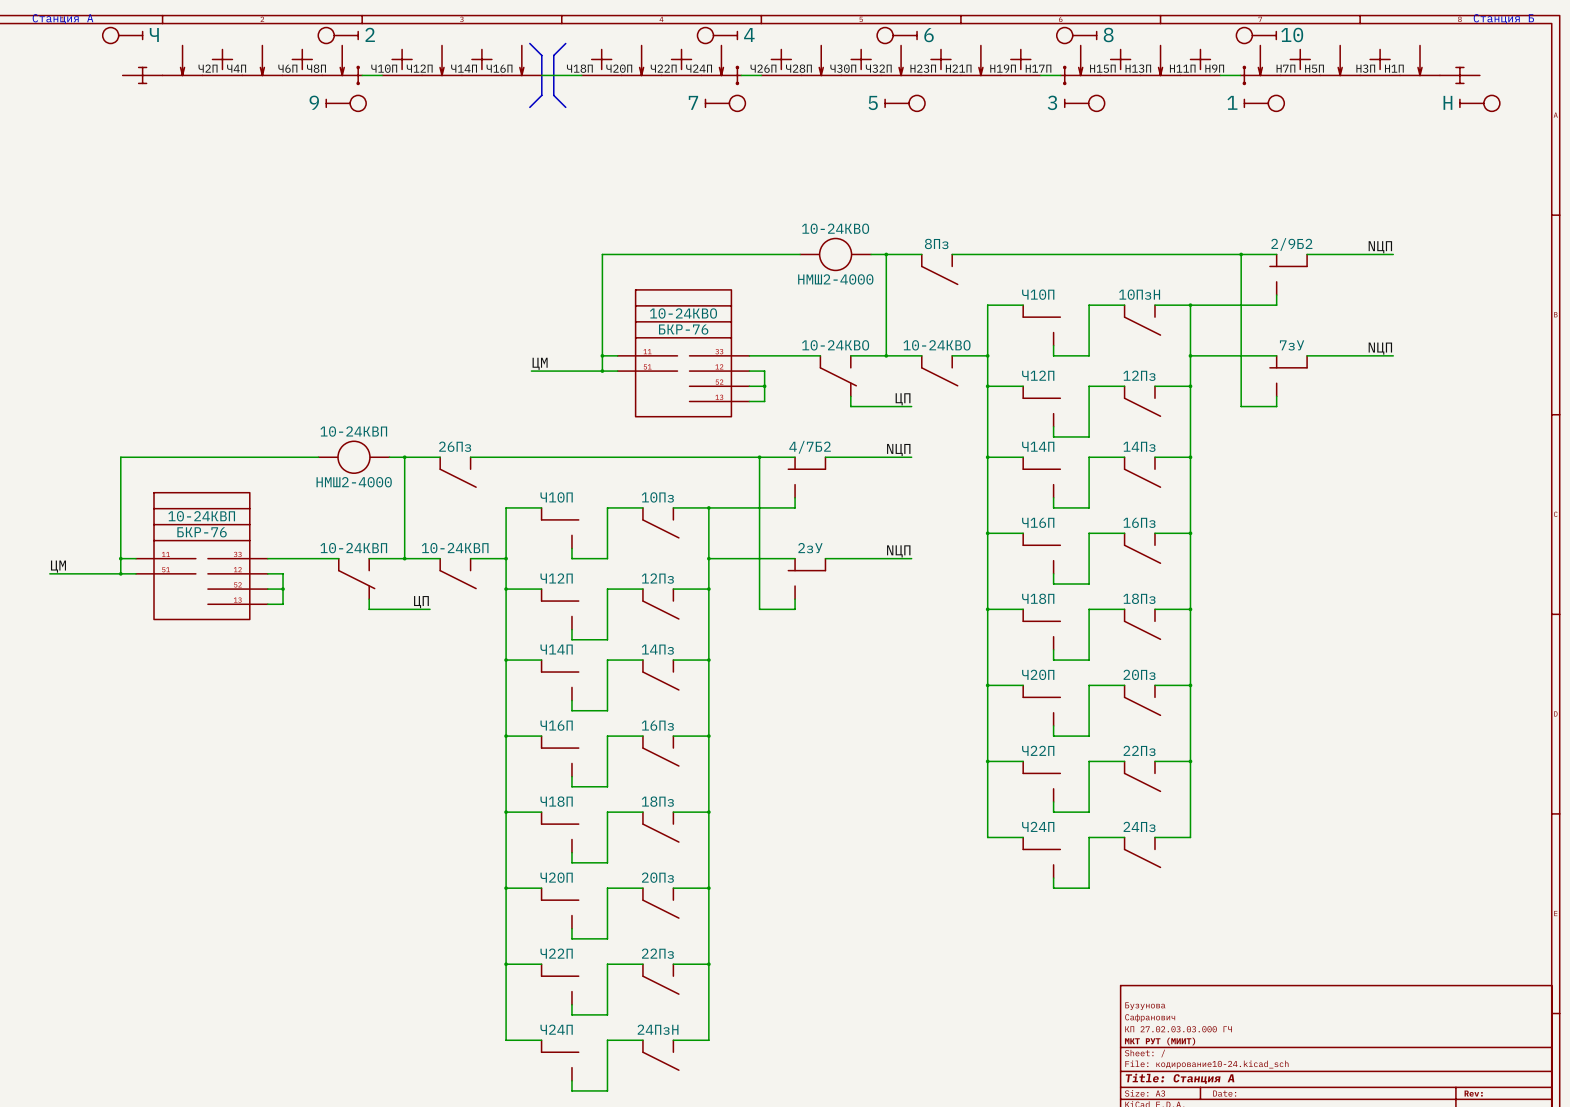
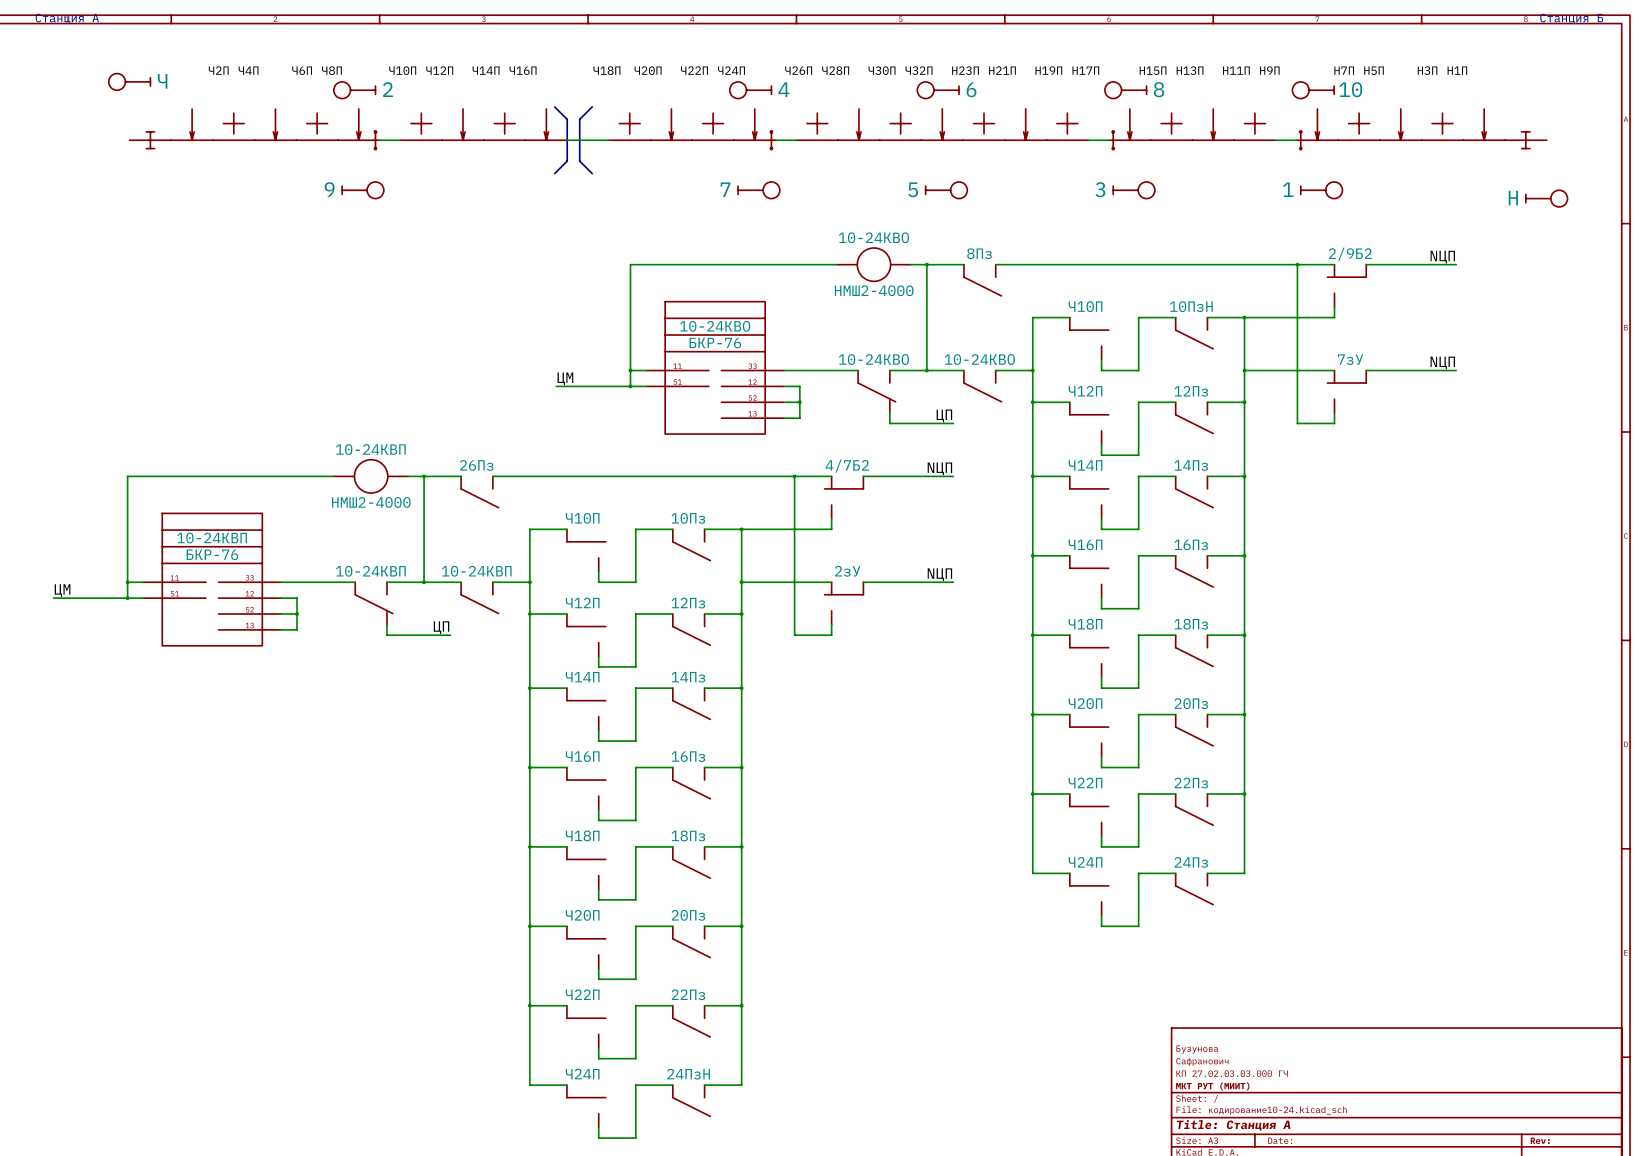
part position: (122, 35) -> (129, 81)
part position: (338, 35) -> (354, 90)
part position: (717, 35) -> (750, 90)
part position: (897, 35) -> (938, 90)
part position: (1076, 35) -> (1125, 90)
part position: (1256, 35) -> (1313, 90)
line: (529, 43) (541, 55) (541, 95) (529, 107) -> (554, 106) (567, 119) (567, 161) (554, 173)
line: (565, 43) (553, 55) (553, 95) (565, 107) -> (592, 106) (579, 119) (579, 161) (592, 173)
part: (182, 60) -> none
part: (262, 60) -> none
part: (342, 60) -> none
part: (442, 60) -> none
part: (521, 60) -> none
part: (641, 60) -> none
part: (721, 60) -> none
part: (821, 60) -> none
part: (901, 60) -> none
part: (980, 60) -> none
part: (1080, 60) -> none
part: (1160, 60) -> none
part: (1260, 60) -> none
part: (1340, 60) -> none
part: (1420, 60) -> none
part: (222, 62) -> none
part: (302, 62) -> none
part: (402, 62) -> none
part: (481, 62) -> none
part: (601, 62) -> none
part: (681, 62) -> none
part: (781, 62) -> none
part: (861, 62) -> none
part: (940, 62) -> none
part: (1020, 62) -> none
part: (1120, 62) -> none
part: (1200, 62) -> none
part: (1300, 62) -> none
part: (1380, 62) -> none
part position: (142, 75) -> (150, 140)
part position: (358, 75) -> (375, 140)
wire: (362, 75) (382, 75) -> (379, 140) (400, 140)
wire: (541, 75) (581, 75) -> (567, 140) (608, 140)
part position: (737, 75) -> (771, 140)
wire: (741, 75) (761, 75) -> (775, 140) (796, 140)
wire: (1040, 75) (1060, 75) -> (1088, 140) (1109, 140)
part position: (1064, 75) -> (1113, 140)
wire: (1220, 75) (1240, 75) -> (1275, 140) (1296, 140)
part position: (1244, 75) -> (1300, 140)
part position: (1459, 75) -> (1525, 140)
part position: (346, 103) -> (362, 190)
part position: (725, 103) -> (758, 190)
part position: (905, 103) -> (946, 190)
part position: (1084, 103) -> (1134, 190)
part position: (1264, 103) -> (1321, 190)
part position: (1479, 103) -> (1546, 198)
part: none -> (192, 124)
part: none -> (275, 124)
part: none -> (358, 124)
part: none -> (463, 124)
part: none -> (546, 124)
part: none -> (671, 124)
part: none -> (754, 124)
part: none -> (858, 124)
part: none -> (942, 124)
part: none -> (1025, 124)
part: none -> (1129, 124)
part: none -> (1213, 124)
part: none -> (1317, 124)
part: none -> (1400, 124)
part: none -> (1484, 124)
part: none -> (233, 126)
part: none -> (317, 126)
part: none -> (421, 126)
part: none -> (504, 126)
part: none -> (629, 126)
part: none -> (713, 126)
part: none -> (817, 126)
part: none -> (900, 126)
part: none -> (984, 126)
part: none -> (1067, 126)
part: none -> (1171, 126)
part: none -> (1254, 126)
part: none -> (1359, 126)
part: none -> (1442, 126)

